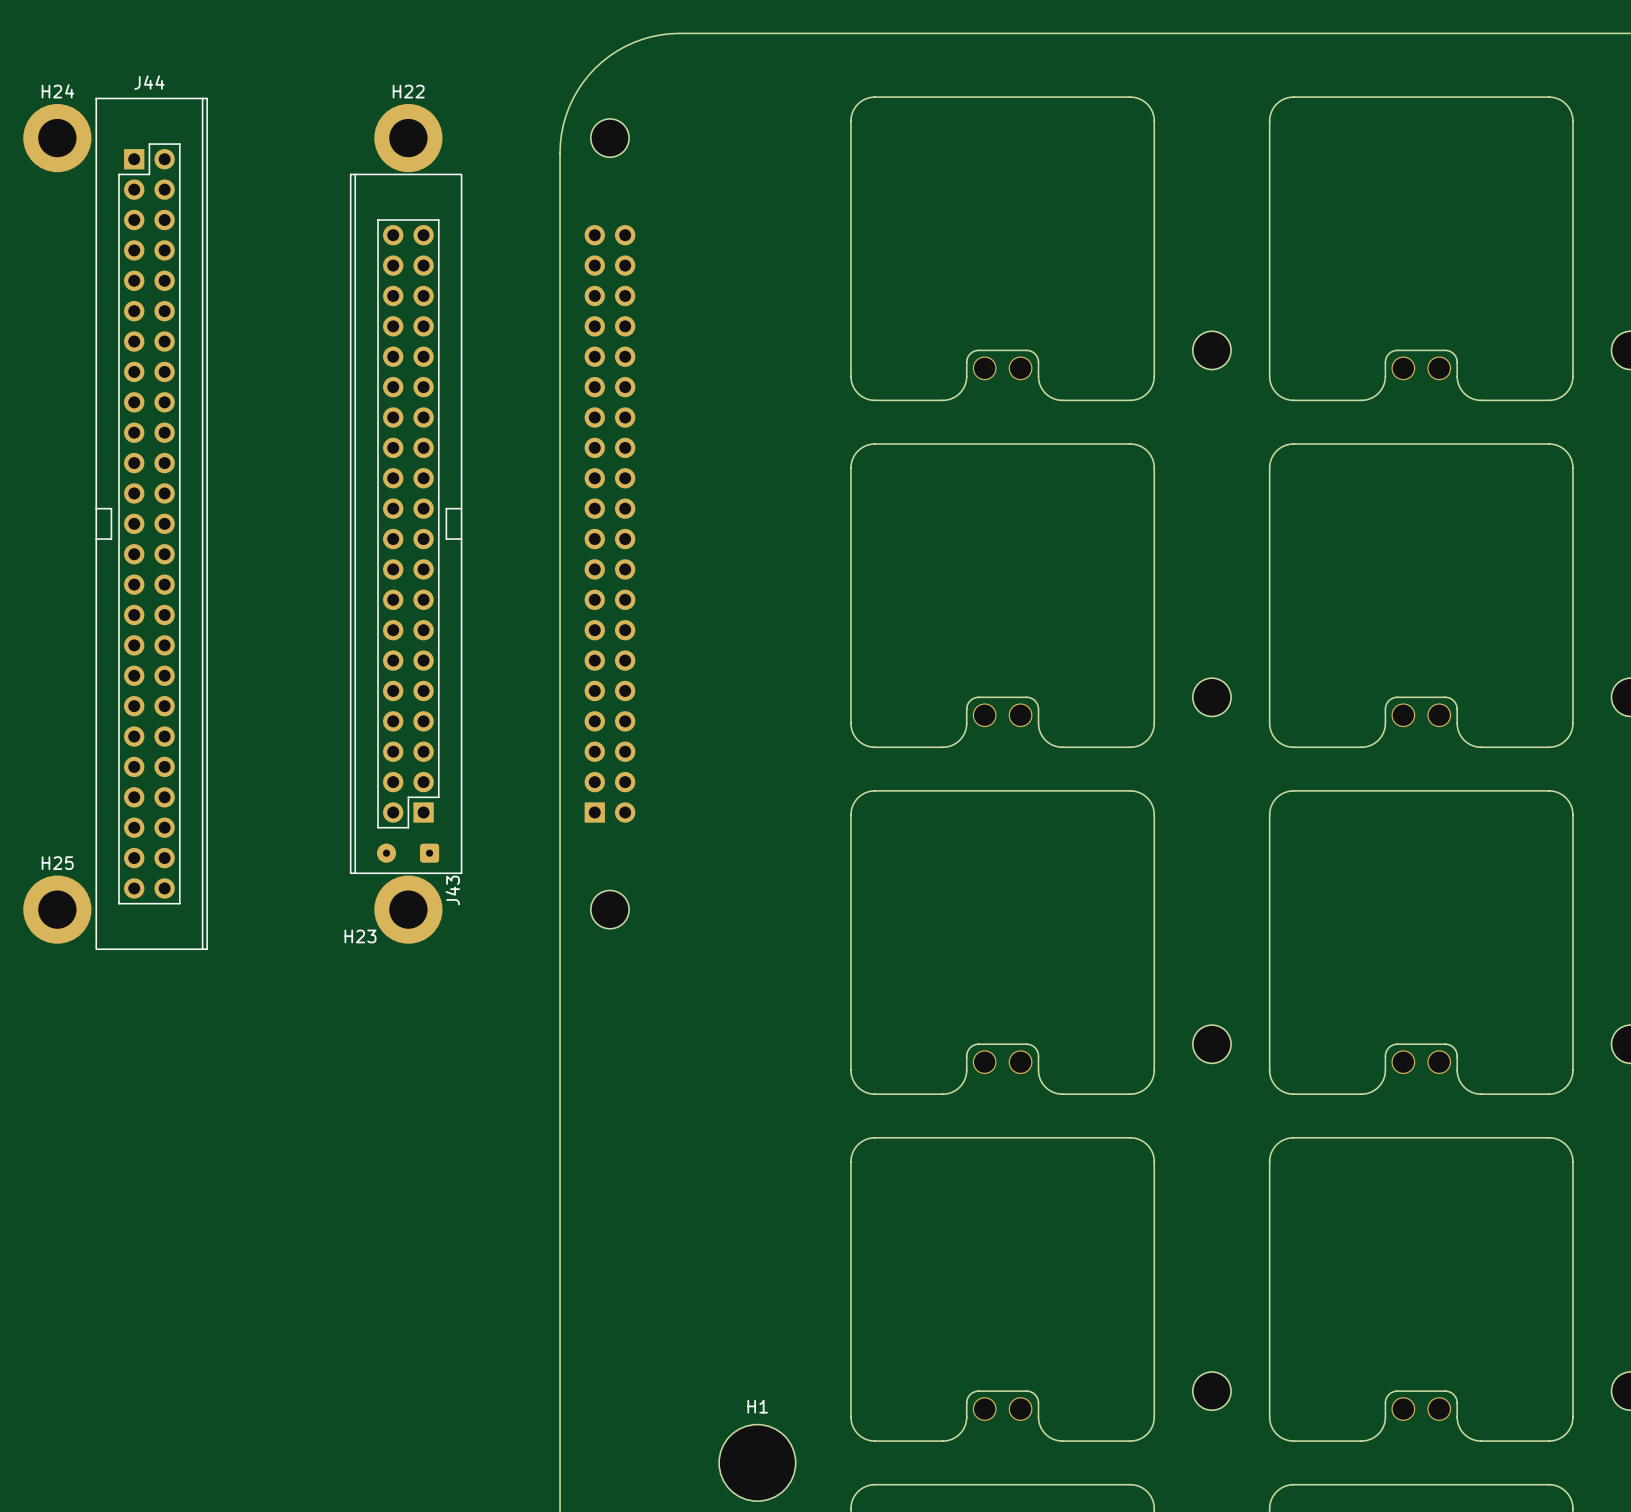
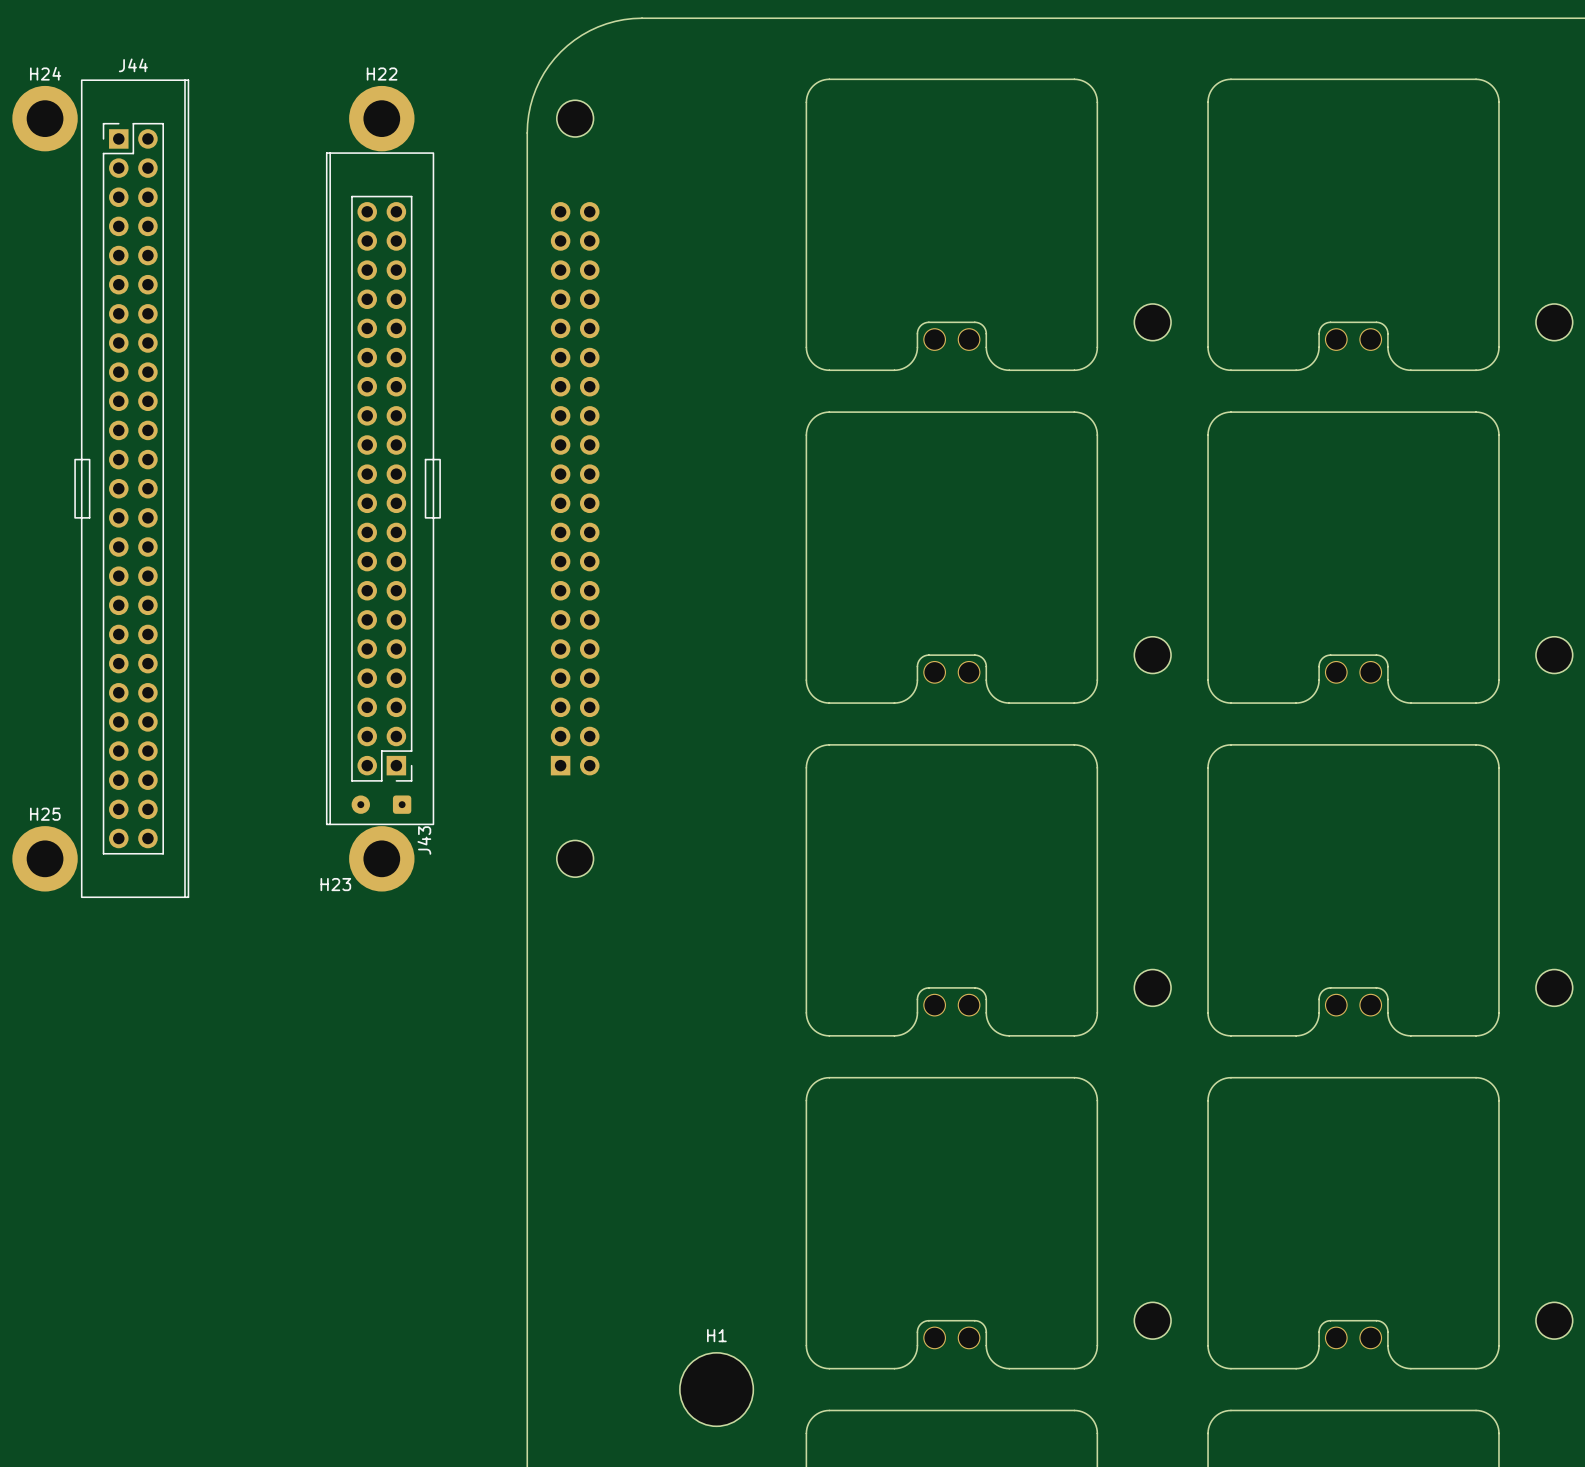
J44 footprint: [95, 97, 208, 950] -> [74, 79, 190, 898]
J43 footprint: [349, 173, 463, 874] -> [326, 152, 441, 826]

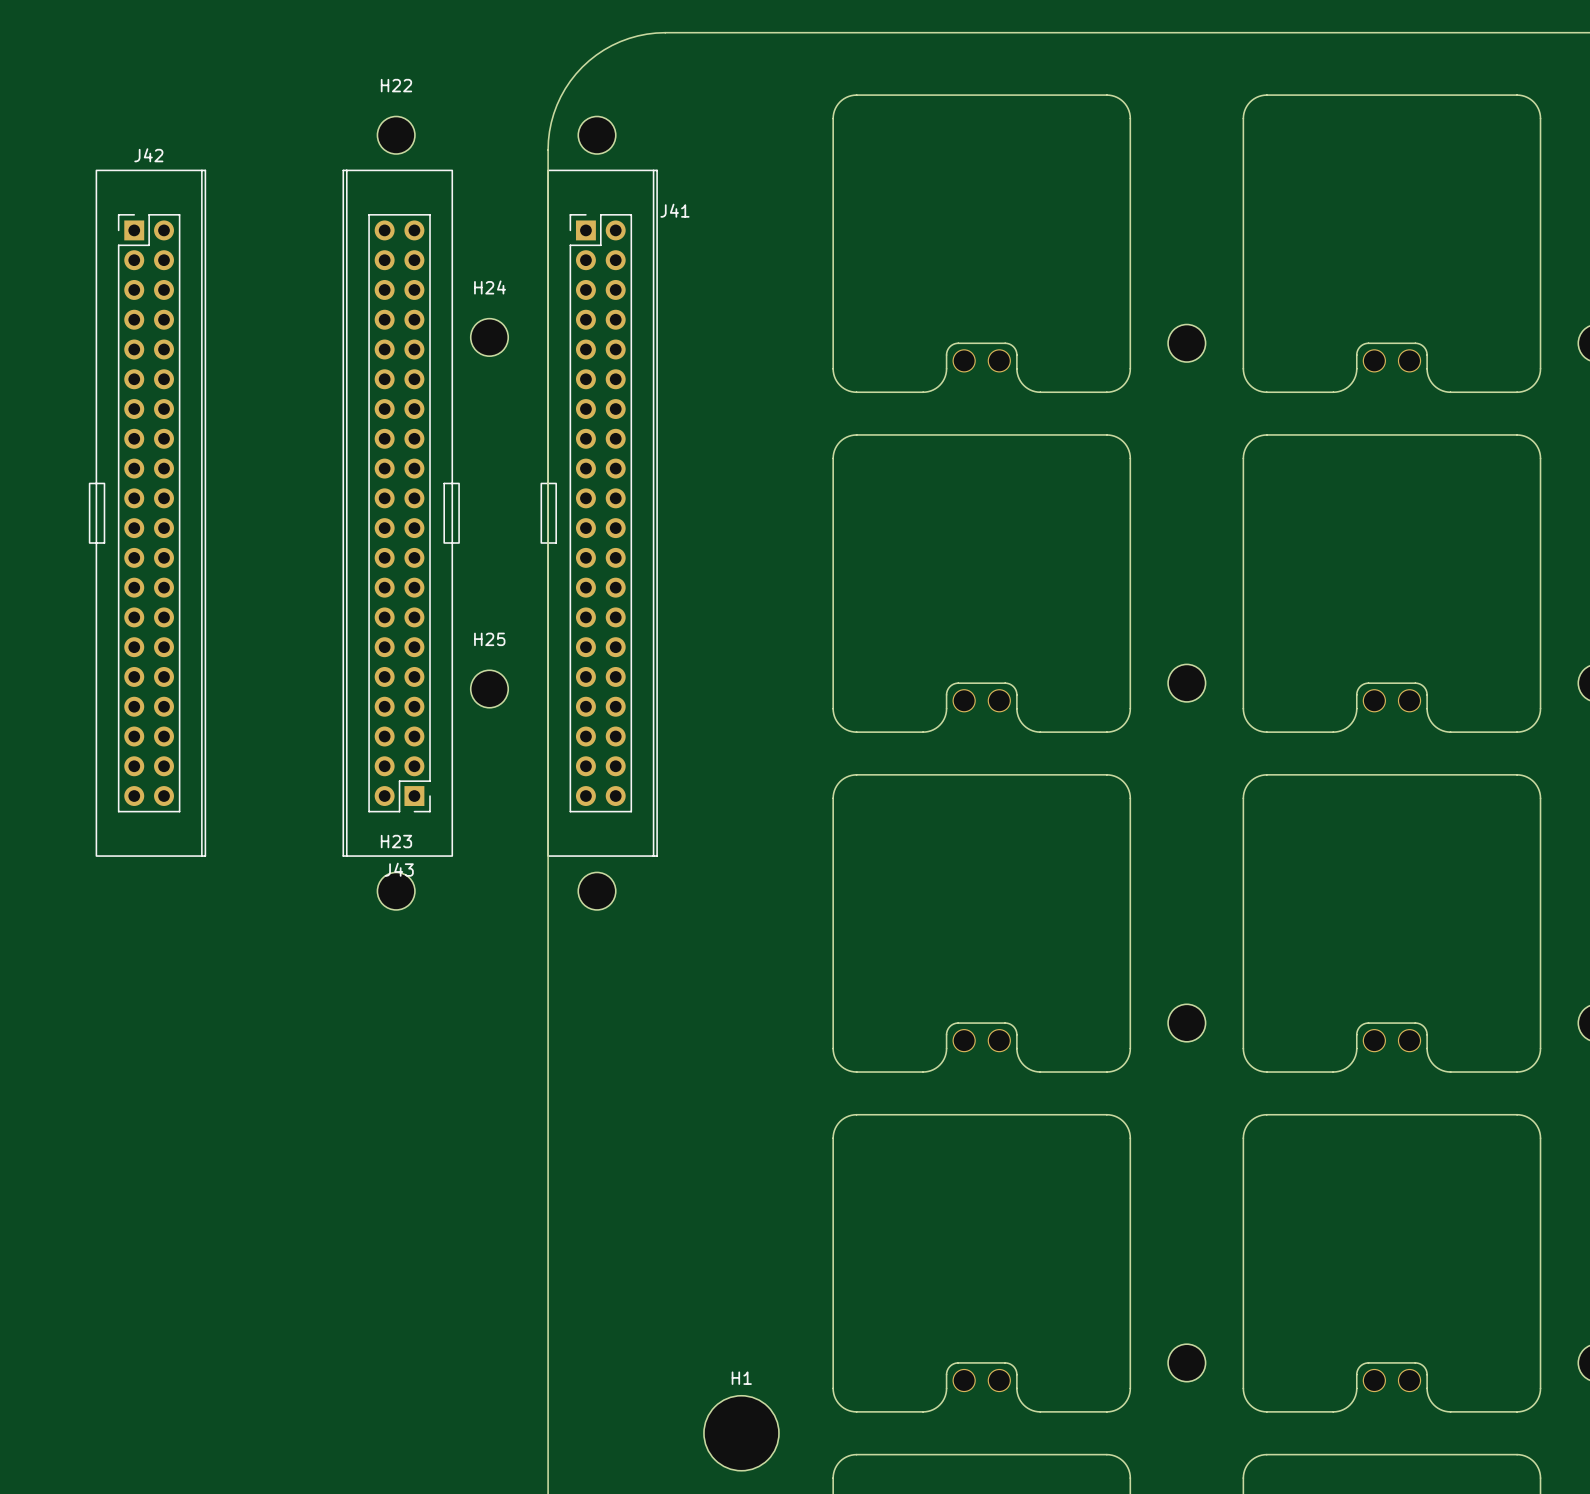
H24 footprint: [12, 85, 78, 152] -> [470, 318, 509, 357]
H22 footprint: [349, 85, 415, 152] -> [377, 116, 415, 155]
J44: (131, 488) -> none
J42: none -> (147, 513)
J41 side: bottom (575, 488) -> top (599, 513)
part: (381, 804) -> none
H25 footprint: [12, 826, 78, 892] -> [470, 670, 509, 708]
H23 footprint: [349, 826, 415, 892] -> [377, 872, 415, 910]
J43 name rotation: 0° (424, 840) -> 90° clockwise (399, 869)
J43 name position: J43 (424, 840) -> J43 (399, 869)
H23 name position: H23 (335, 884) -> H23 (396, 841)

